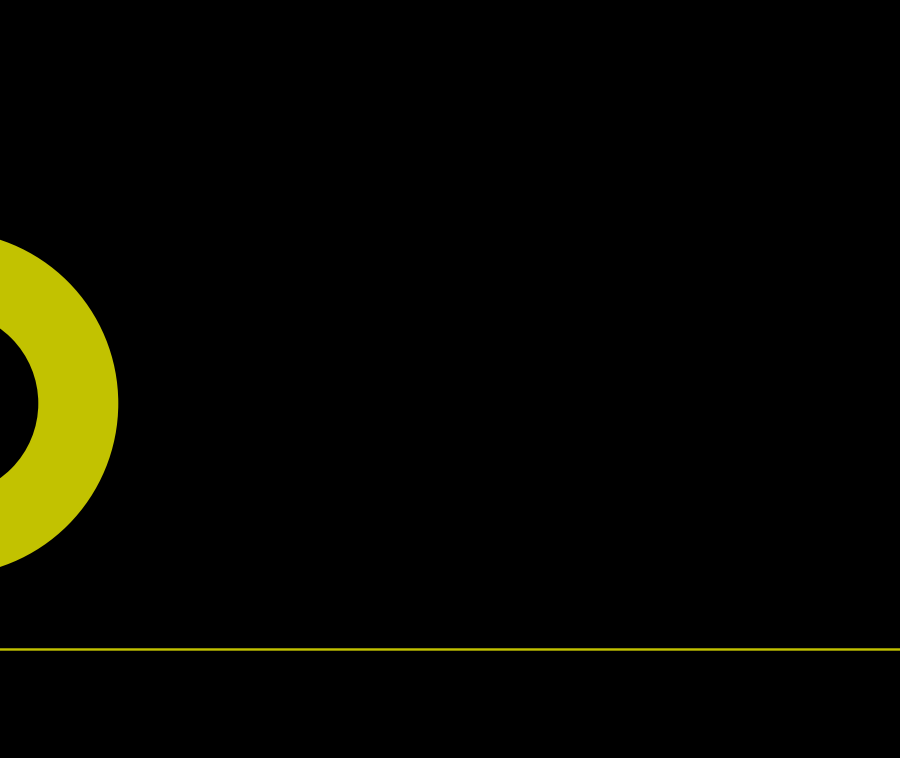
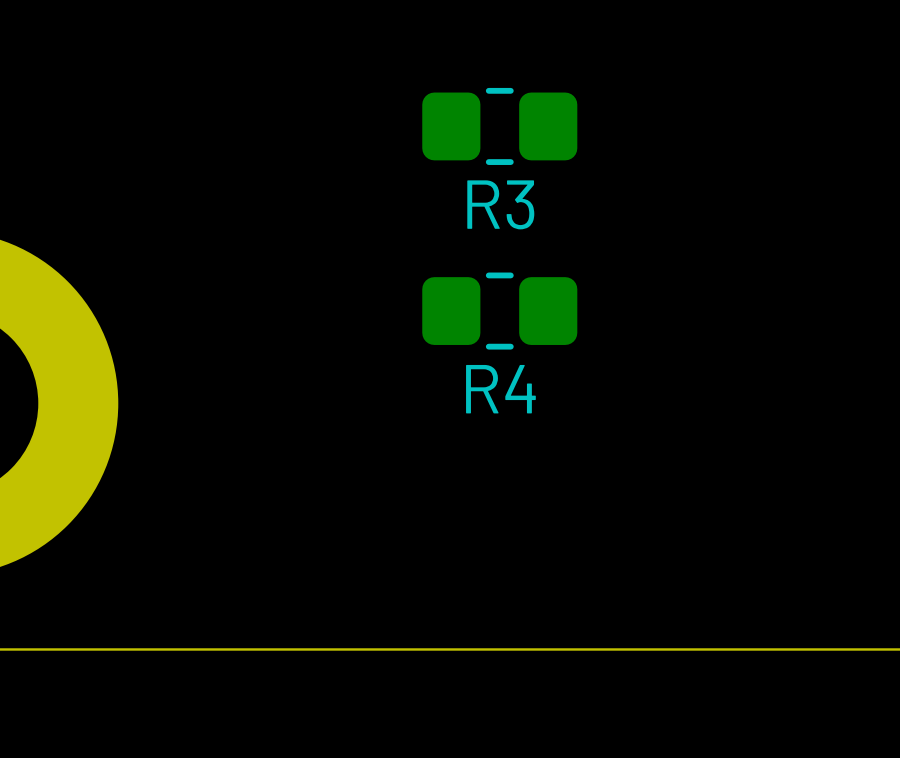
R3: none -> (499, 126)
R4: none -> (499, 311)

